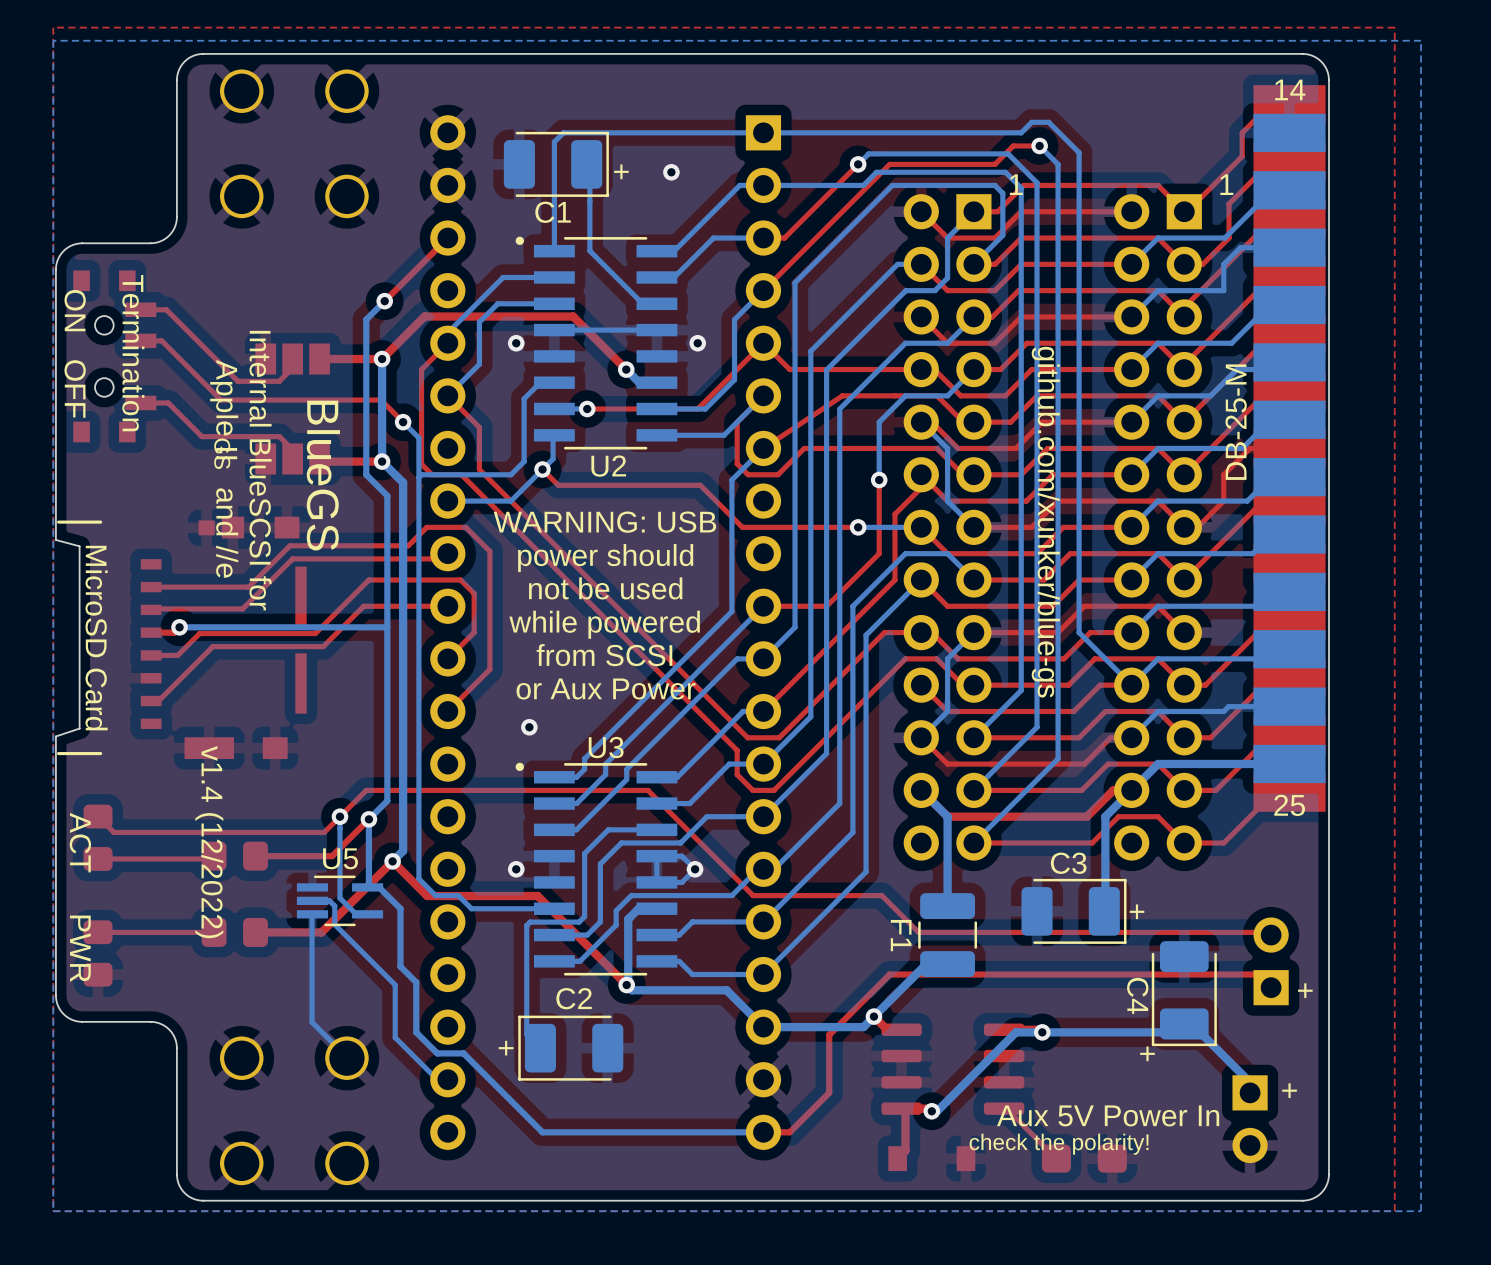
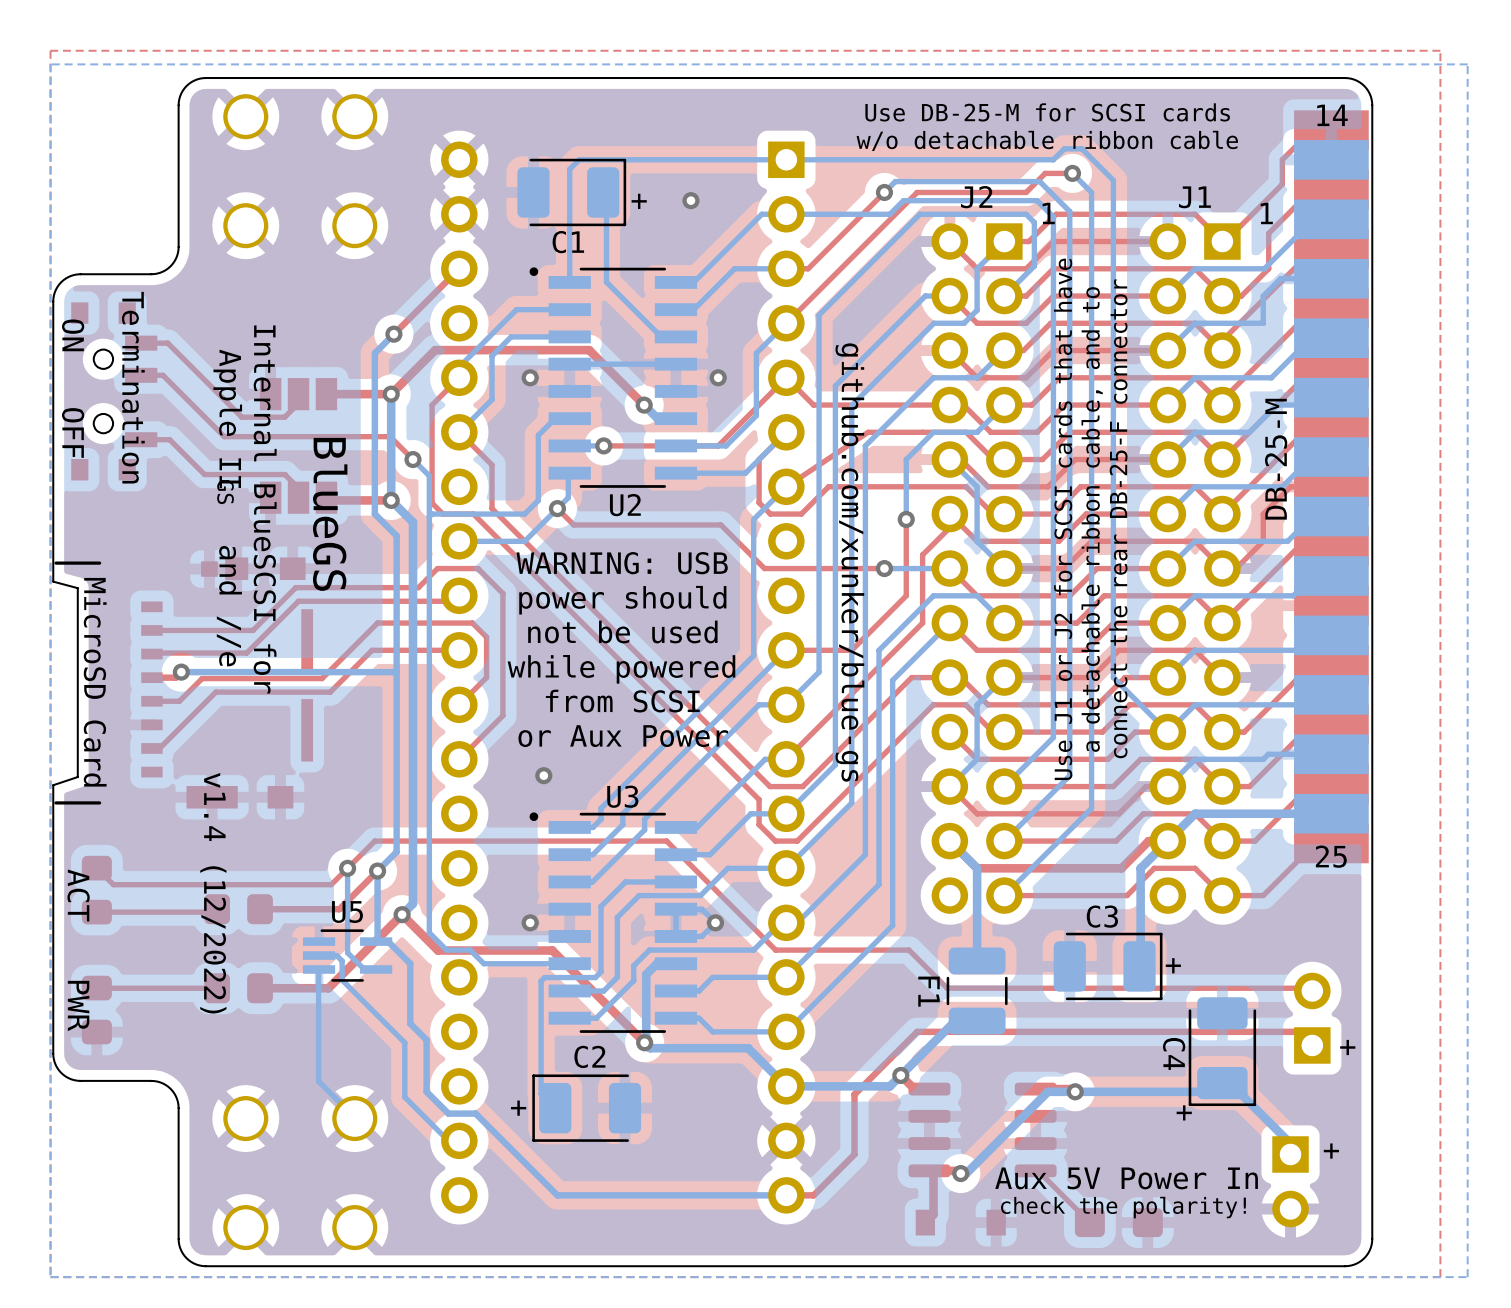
text: none -> Use DB-25-M for SCSI cards (1047, 112)
text: none -> w/o detachable ribbon cable (1047, 140)
text: none -> J2 (976, 197)
text: none -> J1 (1194, 197)
text: none -> Use J1 or J2 for SCSI cards that have (1063, 519)
text: none -> connect the rear DB-25-F connector (1118, 518)
text: none -> a detachable ribbon cable, and to (1092, 519)
text position: github.com/xunker/blue-gs (1045, 522) -> github.com/xunker/blue-gs (849, 562)

